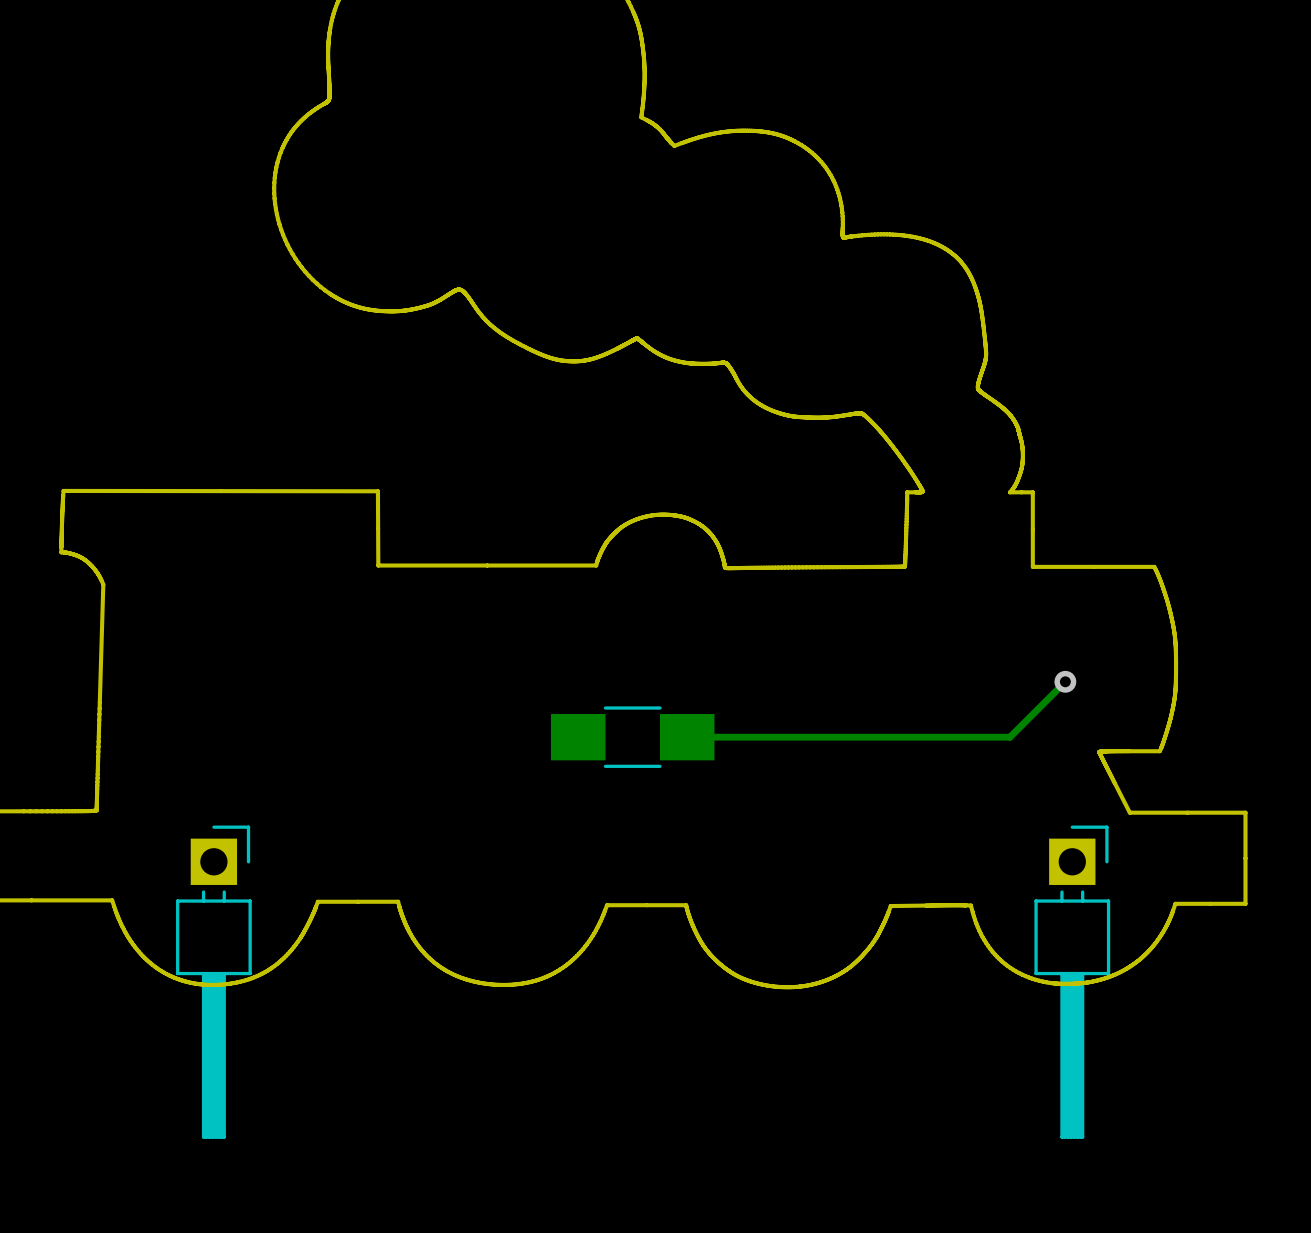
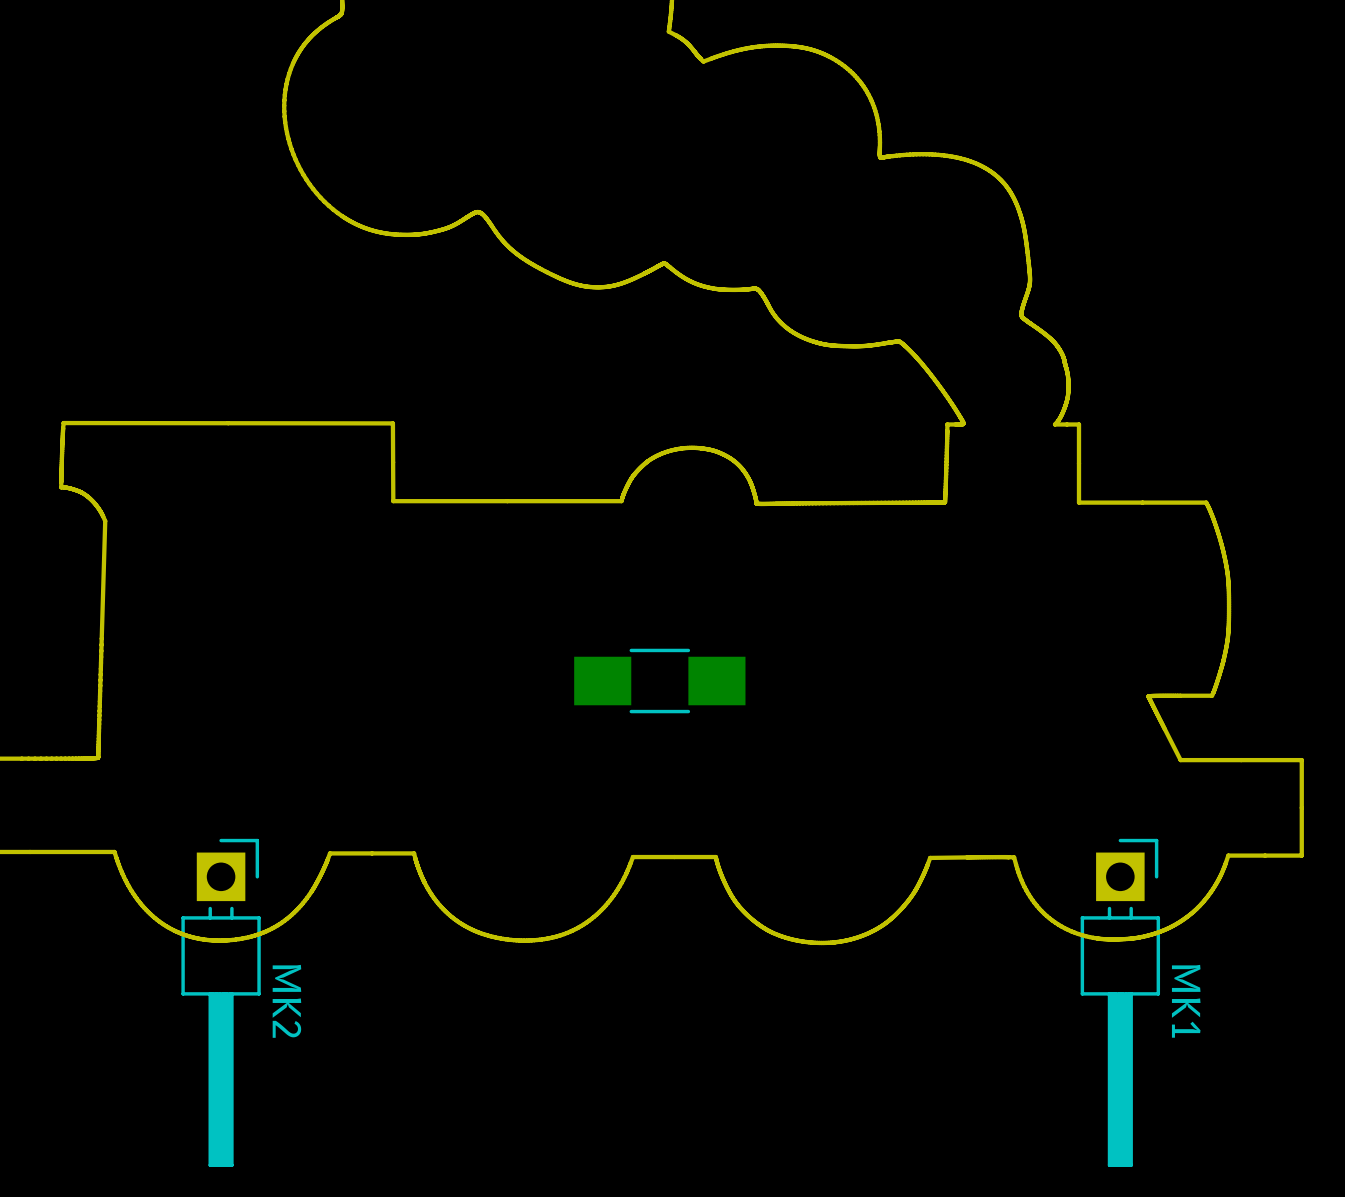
track: (1065, 681) (1009, 737) (687, 737) -> none
via: (1065, 681) -> none
part: (213, 982) -> none
part: (1072, 982) -> none
MK2: none -> (221, 1002)
MK1: none -> (1120, 1002)

